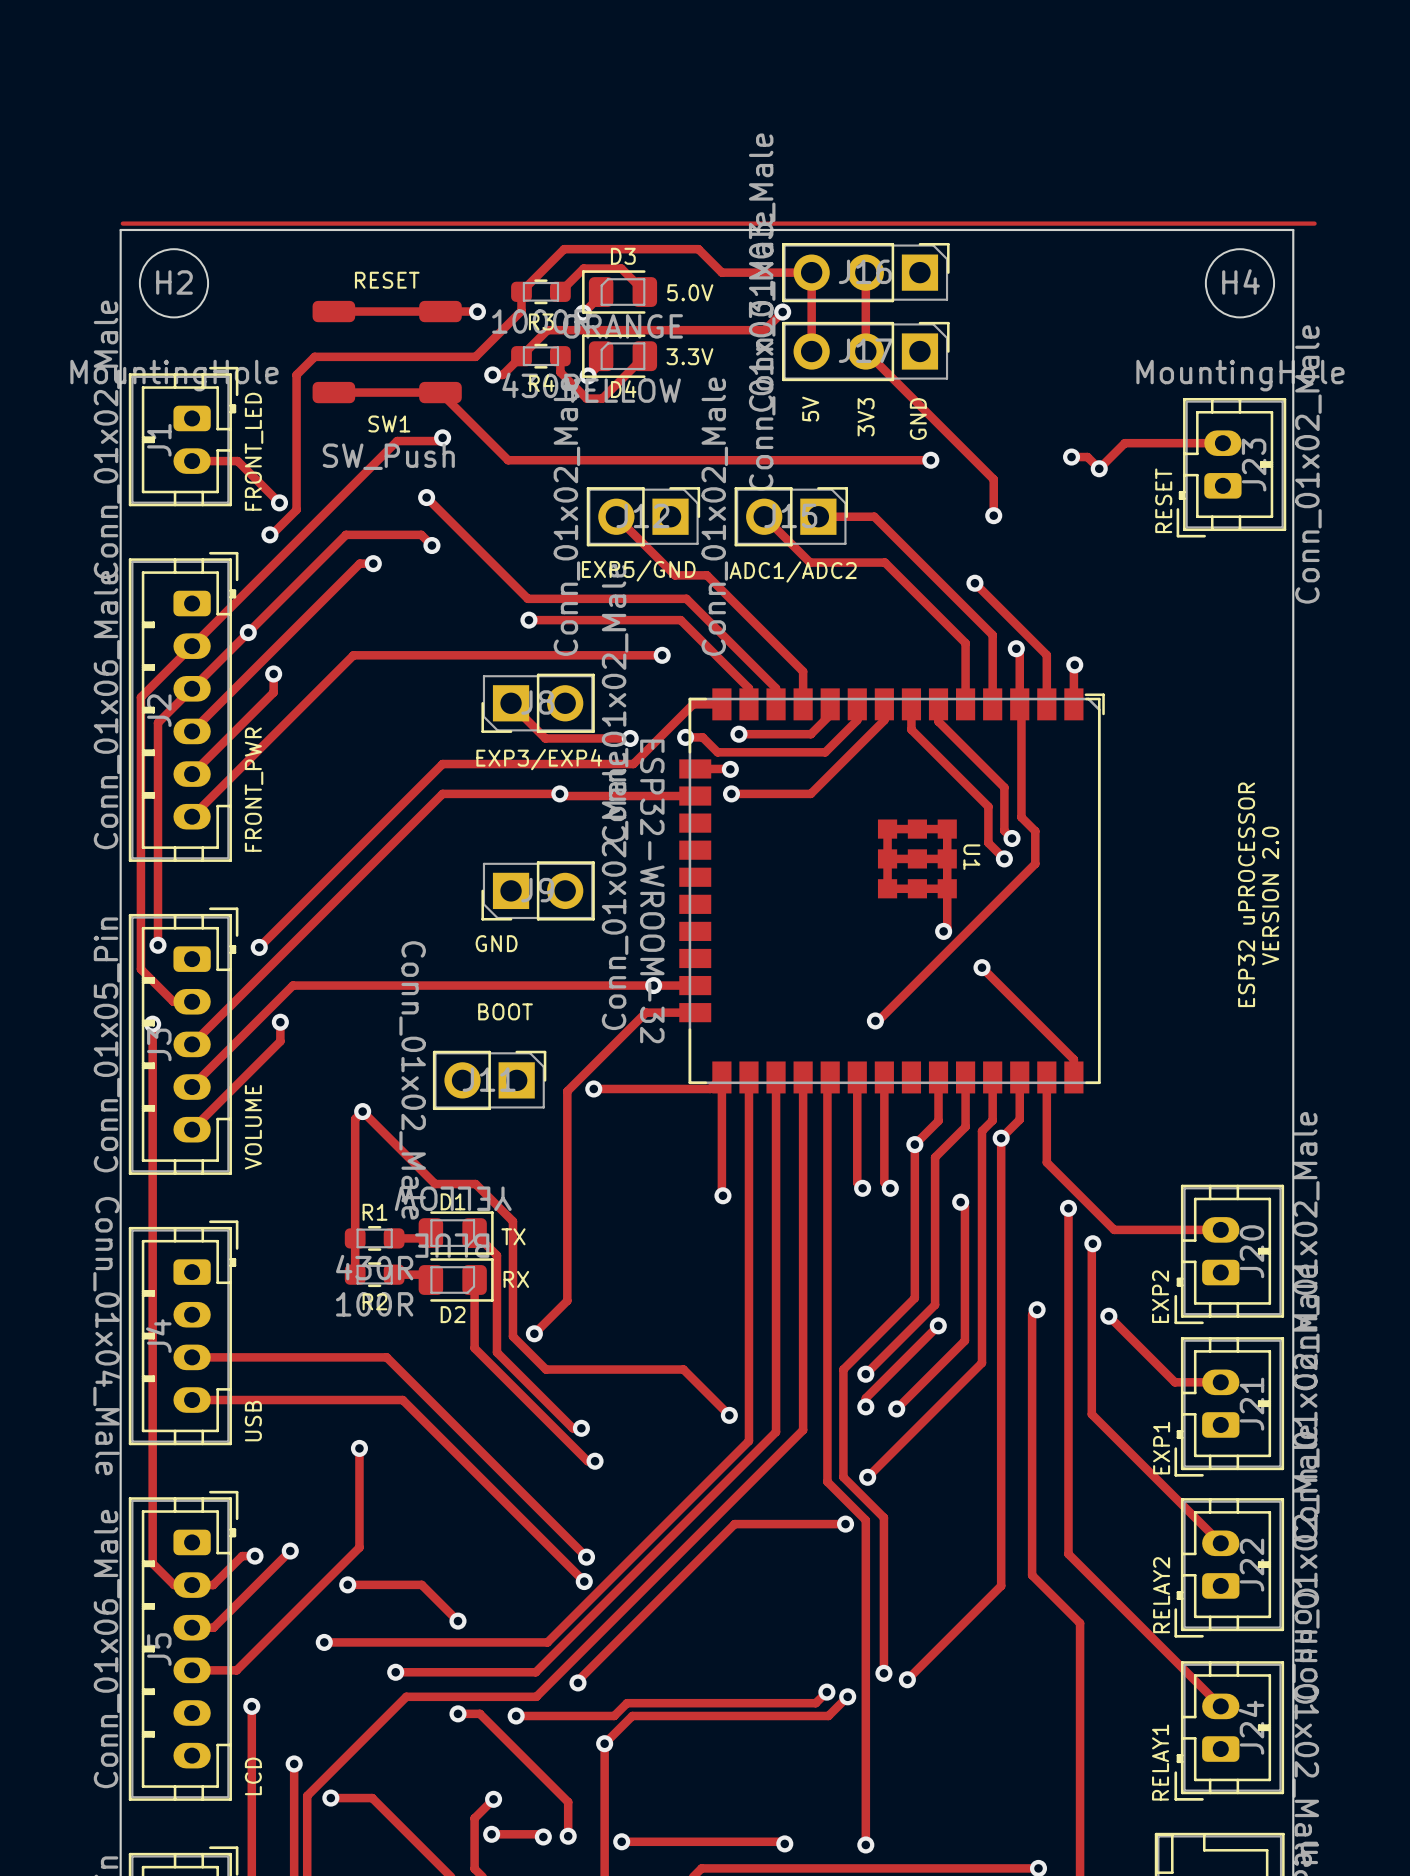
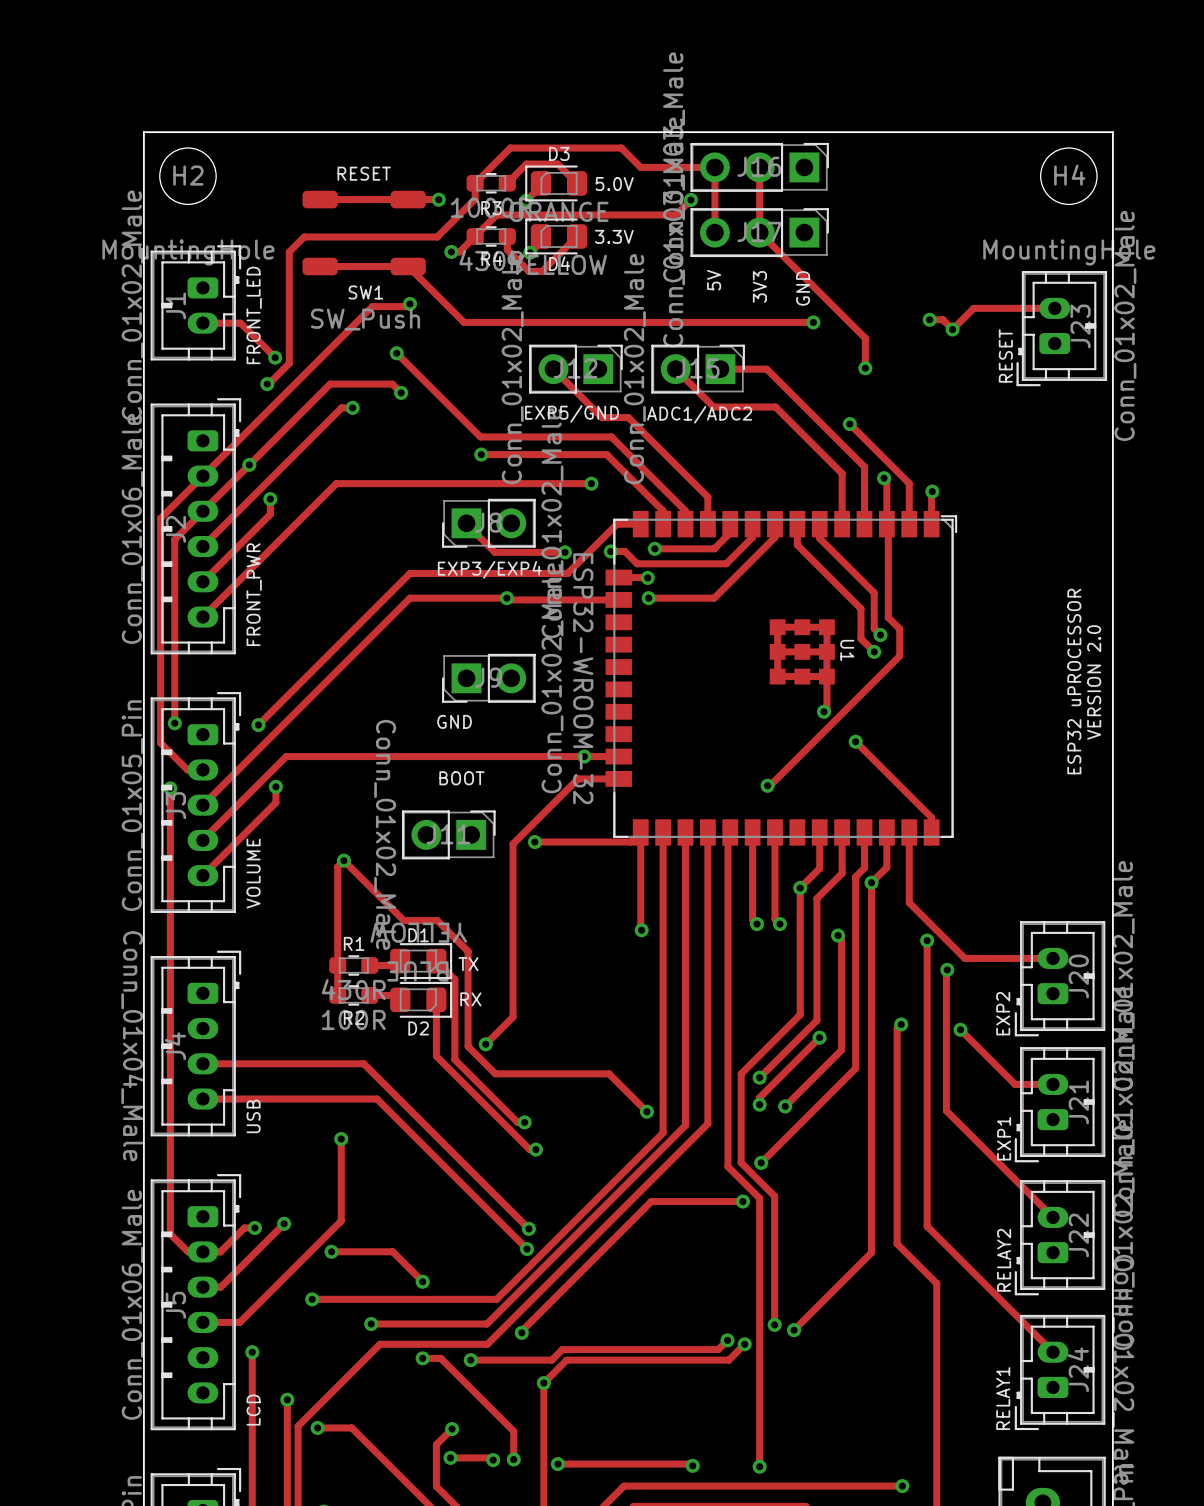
track: (122, 223) (1314, 223) -> none

